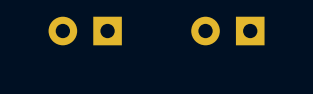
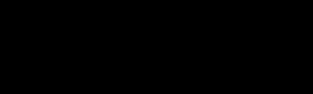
part: (85, 31) -> none
part: (227, 31) -> none

